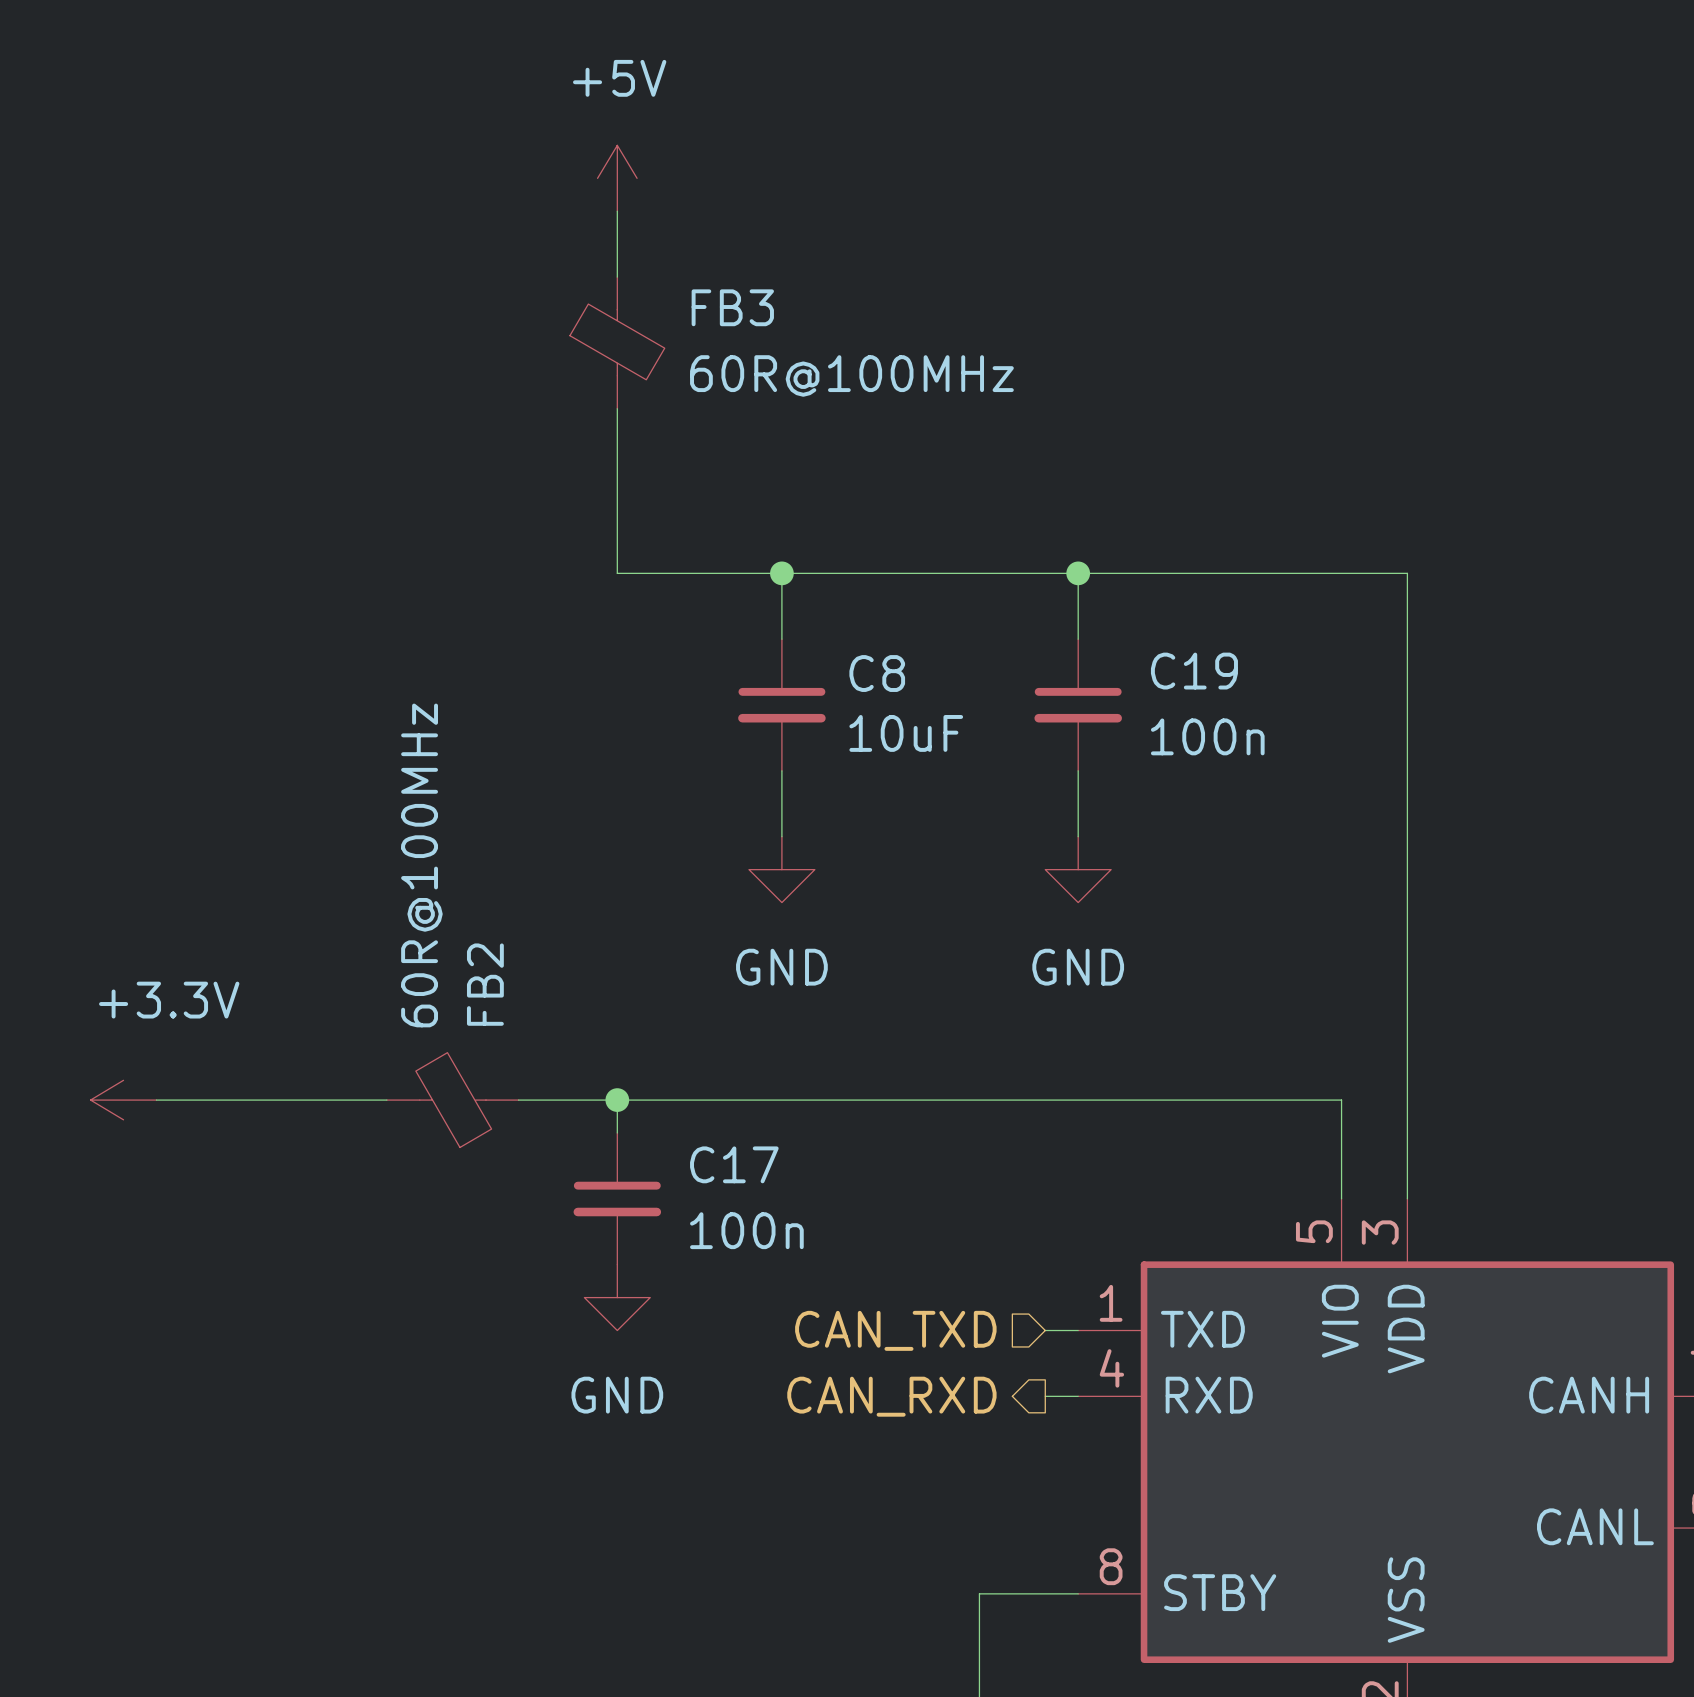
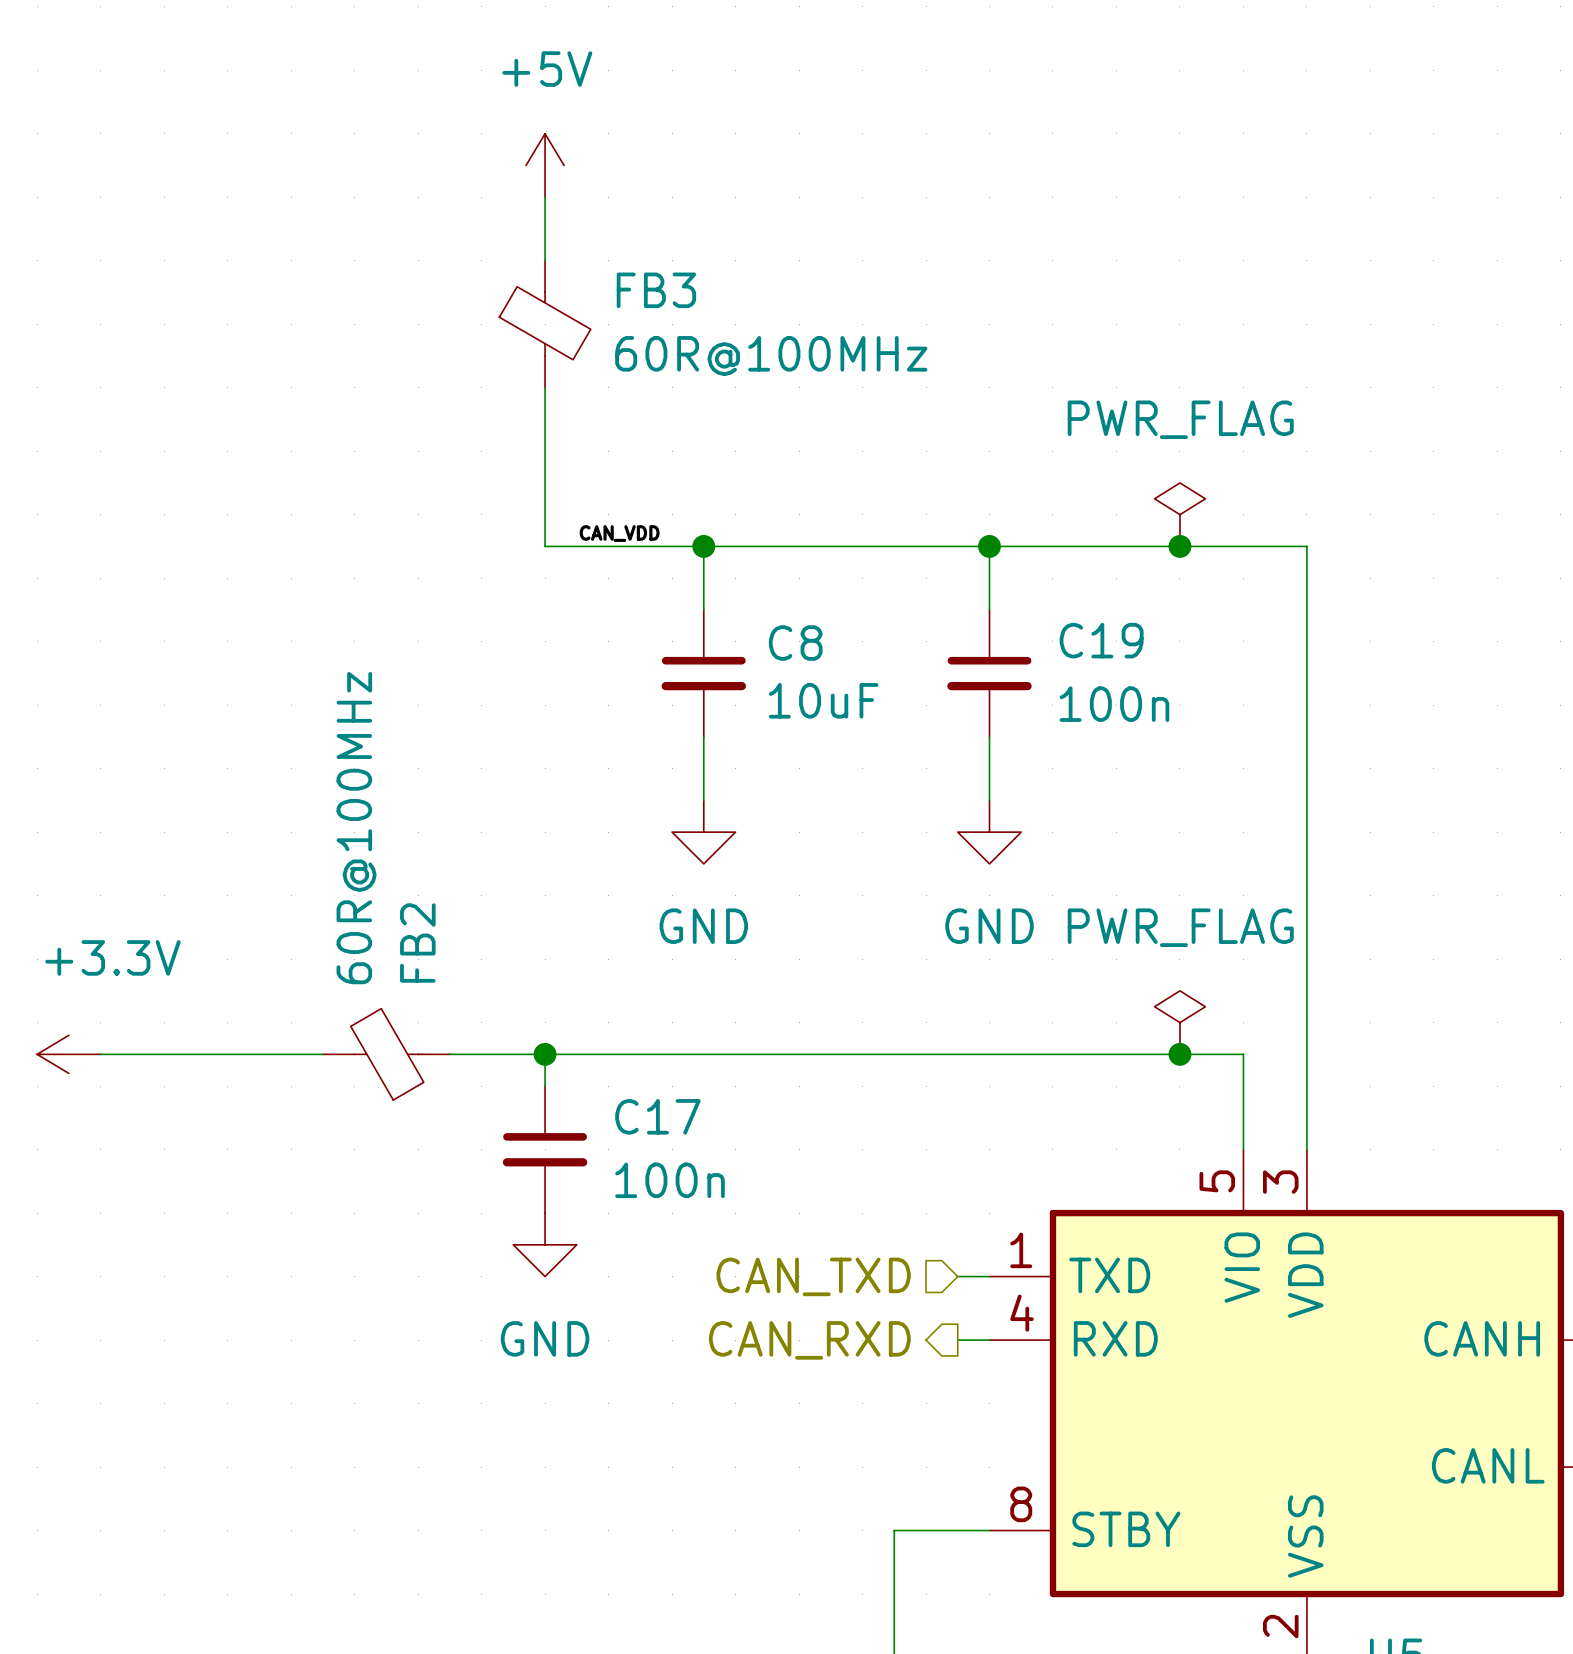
power symbol: none -> PWR_FLAG (1179, 514)
label: none -> CAN_VDD (619, 533)
junction: none -> (1179, 546)
power symbol: none -> PWR_FLAG (1179, 1022)
junction: none -> (1179, 1054)

